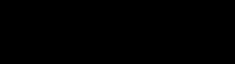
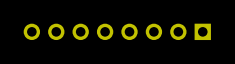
part: none -> (117, 31)

